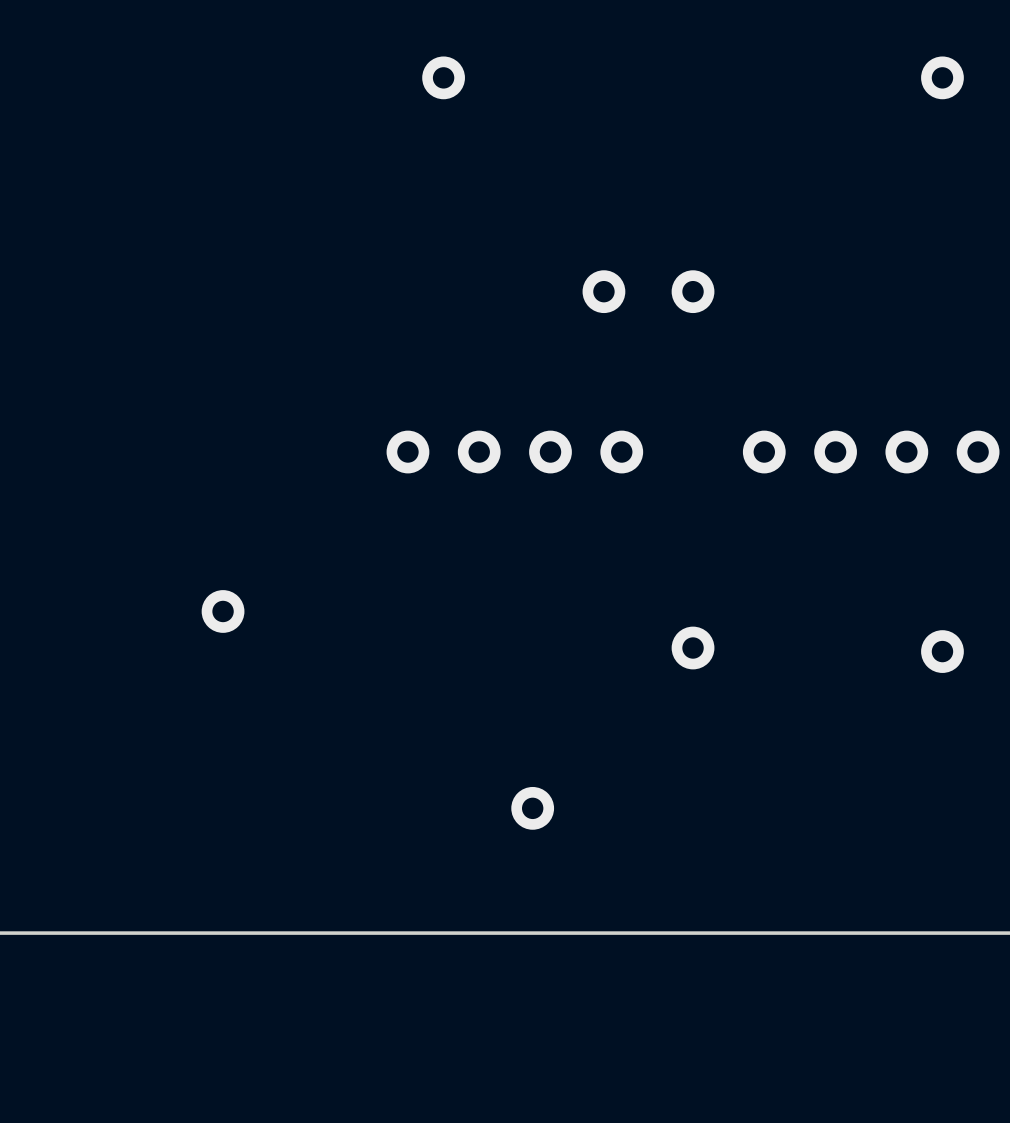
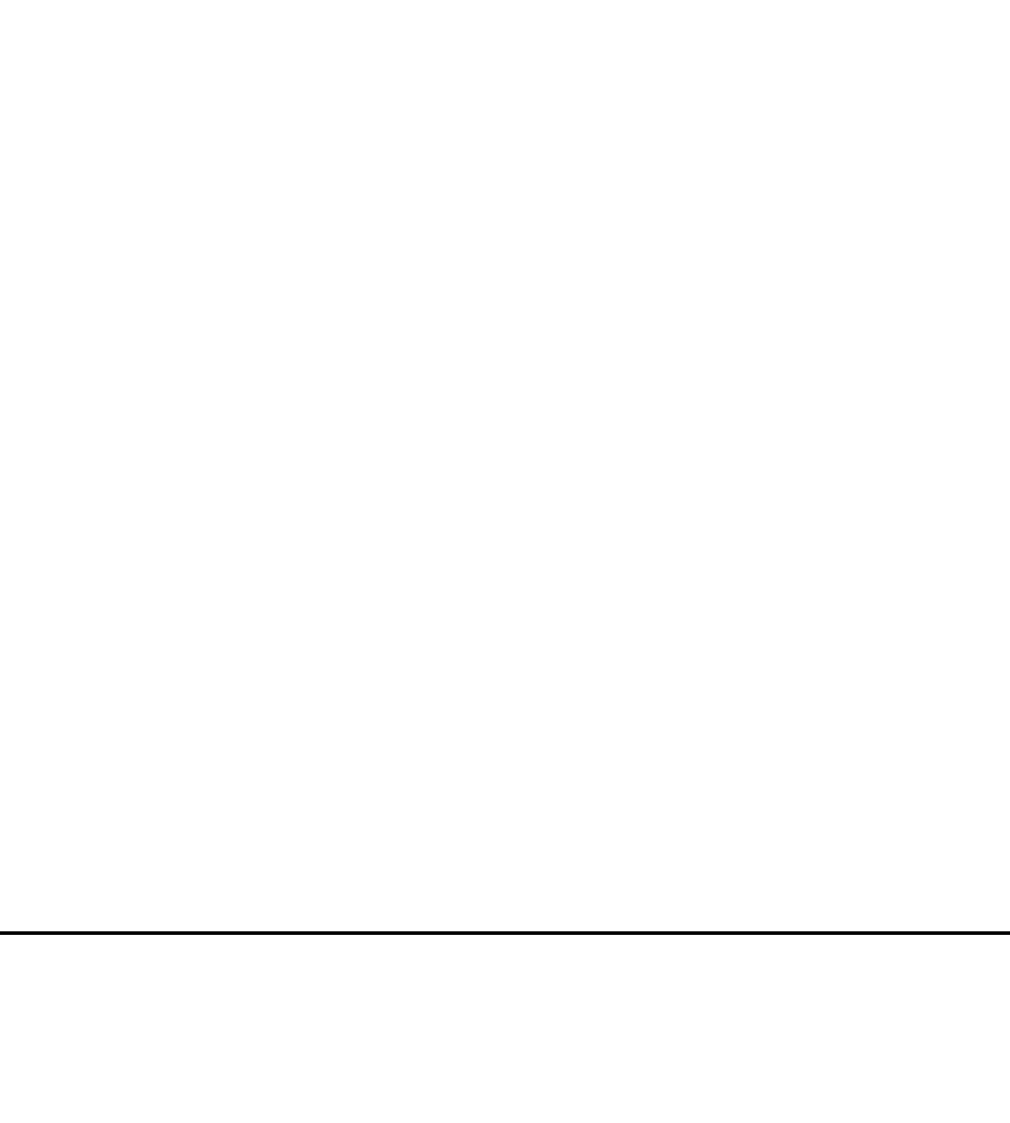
via: (443, 77) -> none
via: (942, 77) -> none
via: (603, 291) -> none
via: (693, 291) -> none
via: (407, 452) -> none
via: (479, 452) -> none
via: (550, 452) -> none
via: (621, 452) -> none
via: (764, 452) -> none
via: (835, 452) -> none
via: (906, 452) -> none
via: (978, 452) -> none
via: (223, 611) -> none
via: (693, 648) -> none
via: (942, 651) -> none
via: (532, 808) -> none

